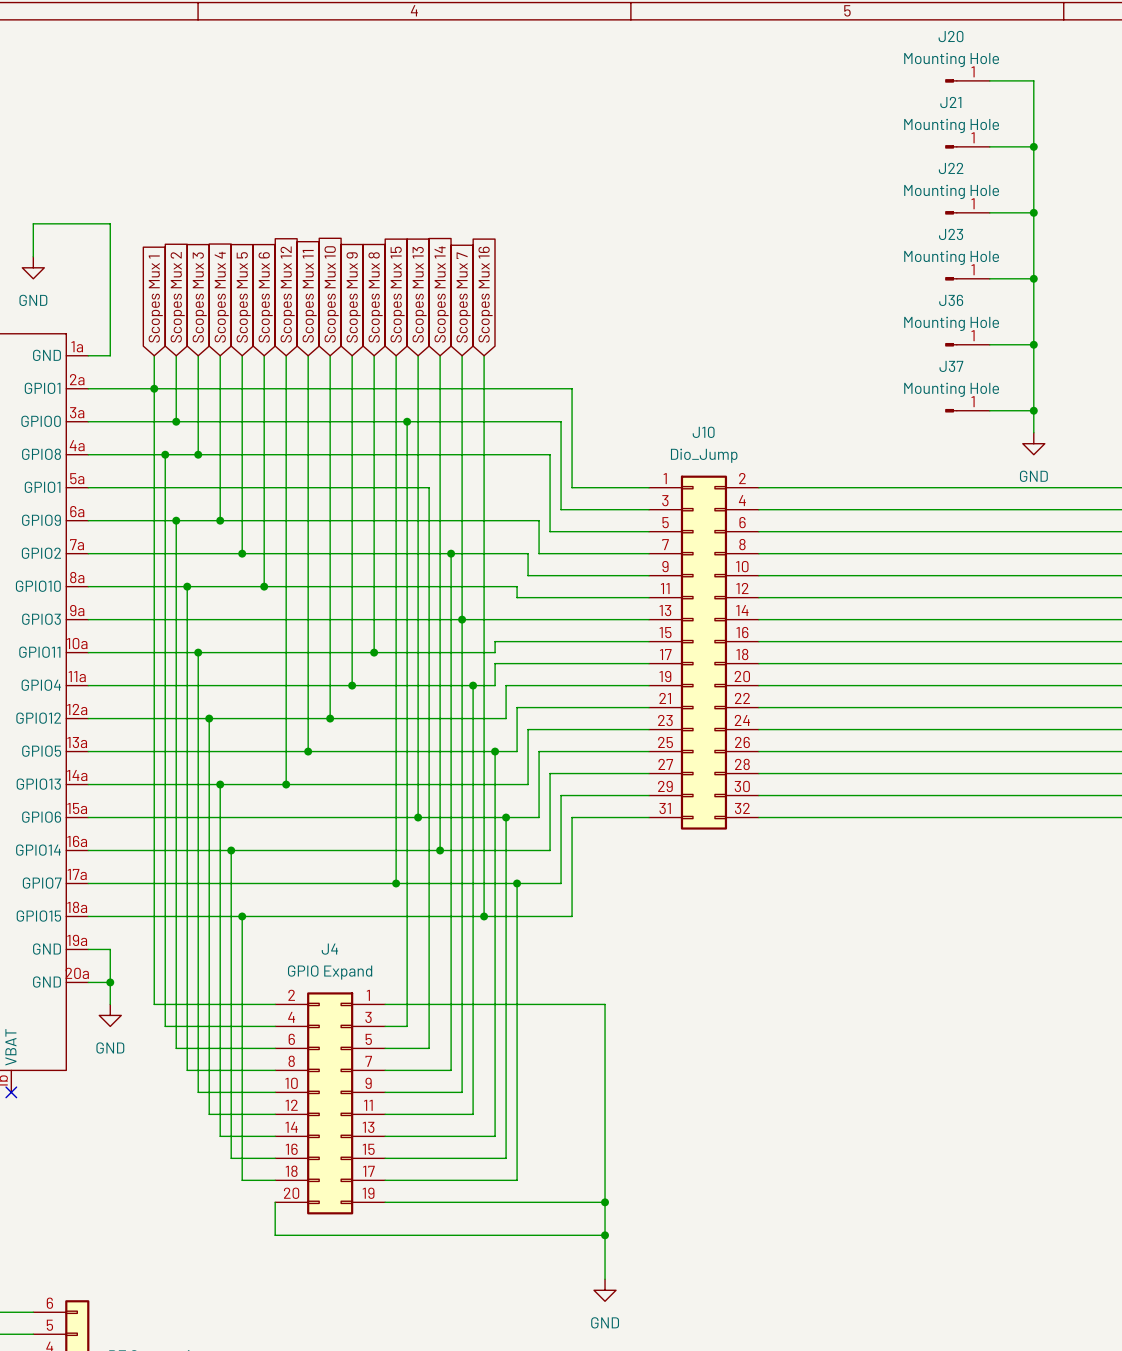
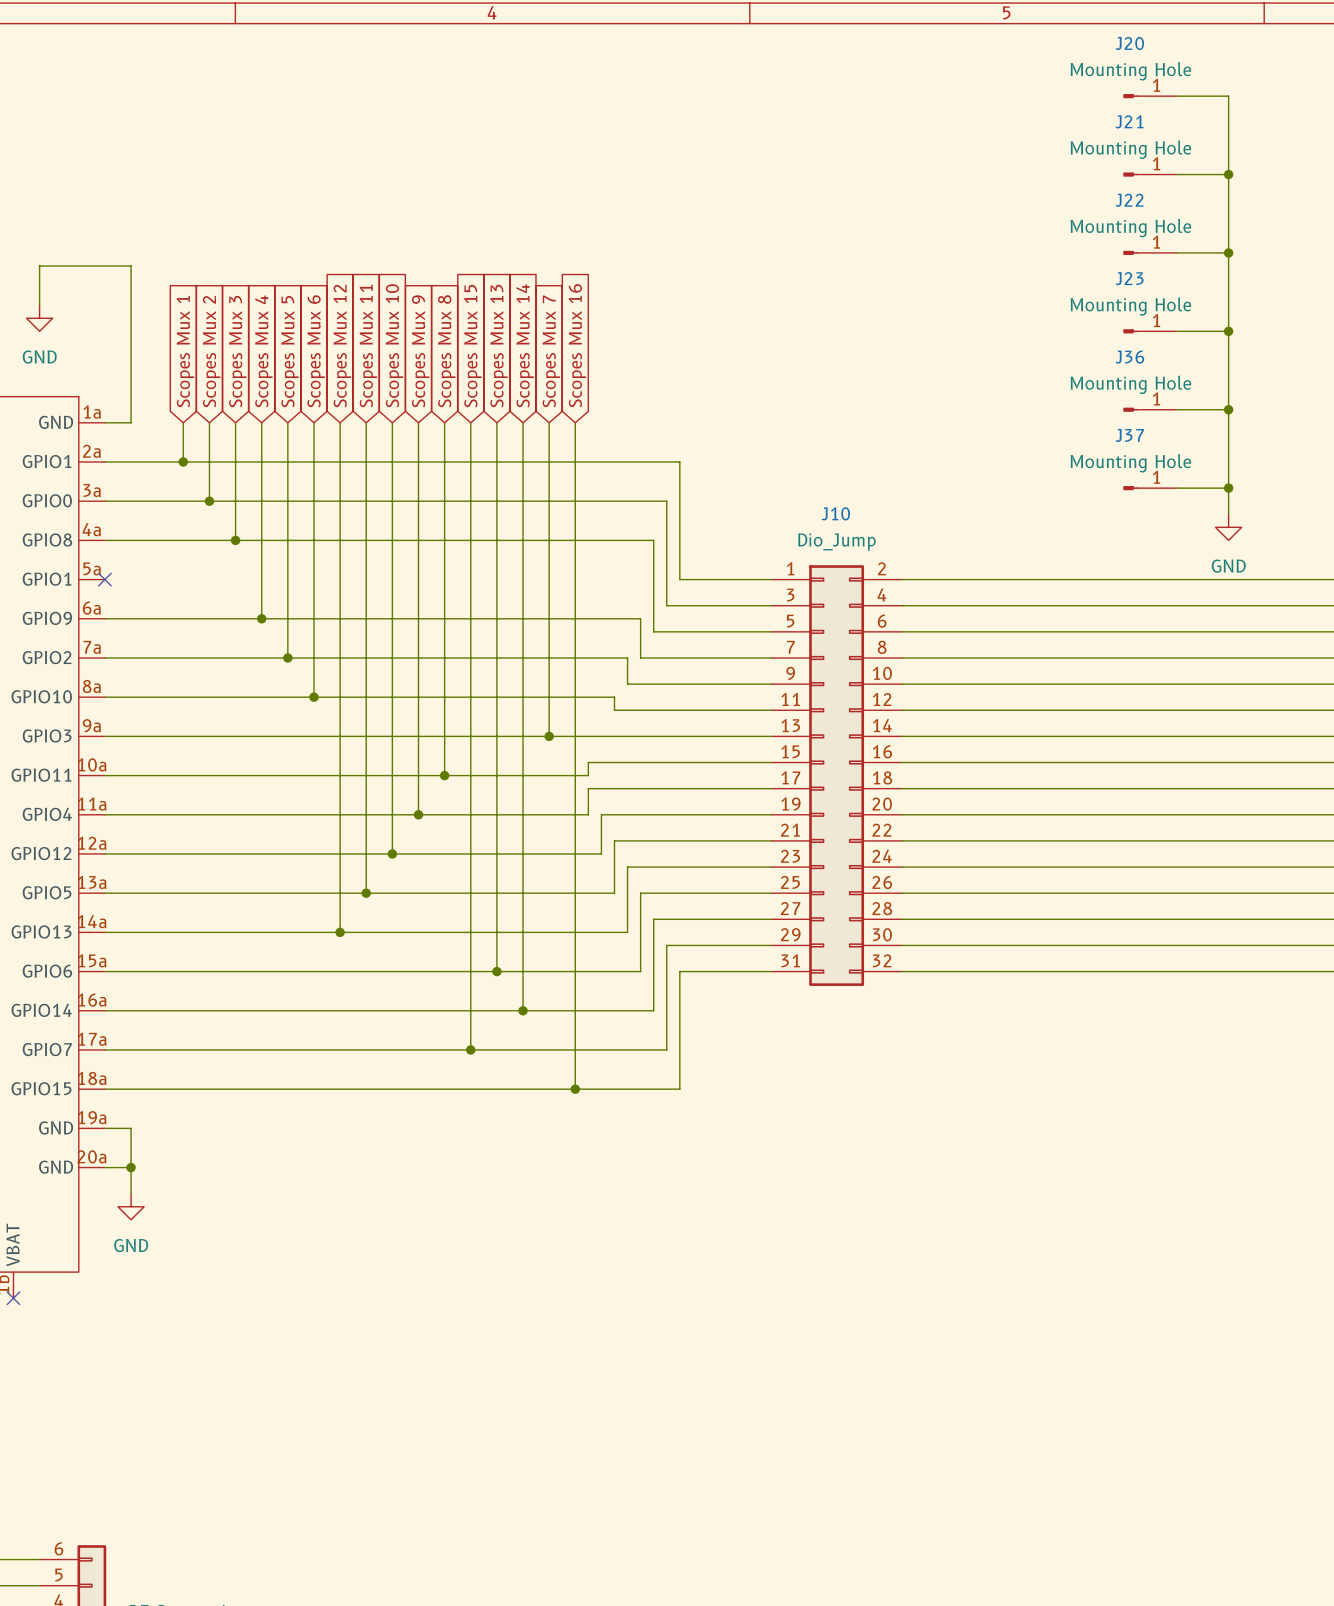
wire: (154, 388) (154, 1004) (275, 1004) -> none
wire: (407, 421) (407, 1026) (385, 1026) -> none
junction: (407, 421) -> none
wire: (165, 454) (165, 1026) (275, 1026) -> none
junction: (165, 454) -> none
wire: (88, 487) (429, 487) (429, 1048) (385, 1048) -> none
no-connect mark: none -> (104, 579)
wire: (176, 520) (176, 1048) (275, 1048) -> none
junction: (176, 520) -> none
wire: (451, 553) (451, 1070) (385, 1070) -> none
junction: (451, 553) -> none
wire: (187, 586) (187, 1070) (275, 1070) -> none
junction: (187, 586) -> none
wire: (462, 619) (462, 1092) (385, 1092) -> none
wire: (198, 652) (198, 1092) (275, 1092) -> none
junction: (198, 652) -> none
wire: (473, 685) (473, 1114) (385, 1114) -> none
junction: (473, 685) -> none
wire: (209, 718) (209, 1114) (275, 1114) -> none
junction: (209, 718) -> none
wire: (495, 751) (495, 1136) (385, 1136) -> none
junction: (495, 751) -> none
wire: (220, 784) (220, 1136) (275, 1136) -> none
junction: (220, 784) -> none
wire: (506, 817) (506, 1158) (385, 1158) -> none
junction: (506, 817) -> none
wire: (231, 850) (231, 1158) (275, 1158) -> none
junction: (231, 850) -> none
wire: (517, 883) (517, 1180) (385, 1180) -> none
junction: (517, 883) -> none
wire: (242, 916) (242, 1180) (275, 1180) -> none
junction: (242, 916) -> none
wire: (385, 1004) (605, 1004) (605, 1279) -> none
J4: GPIO Expand (330, 1103) -> none
wire: (275, 1202) (275, 1235) (605, 1235) -> none
wire: (385, 1202) (605, 1202) -> none
junction: (605, 1202) -> none
junction: (605, 1235) -> none
power symbol: GND (605, 1290) -> none

